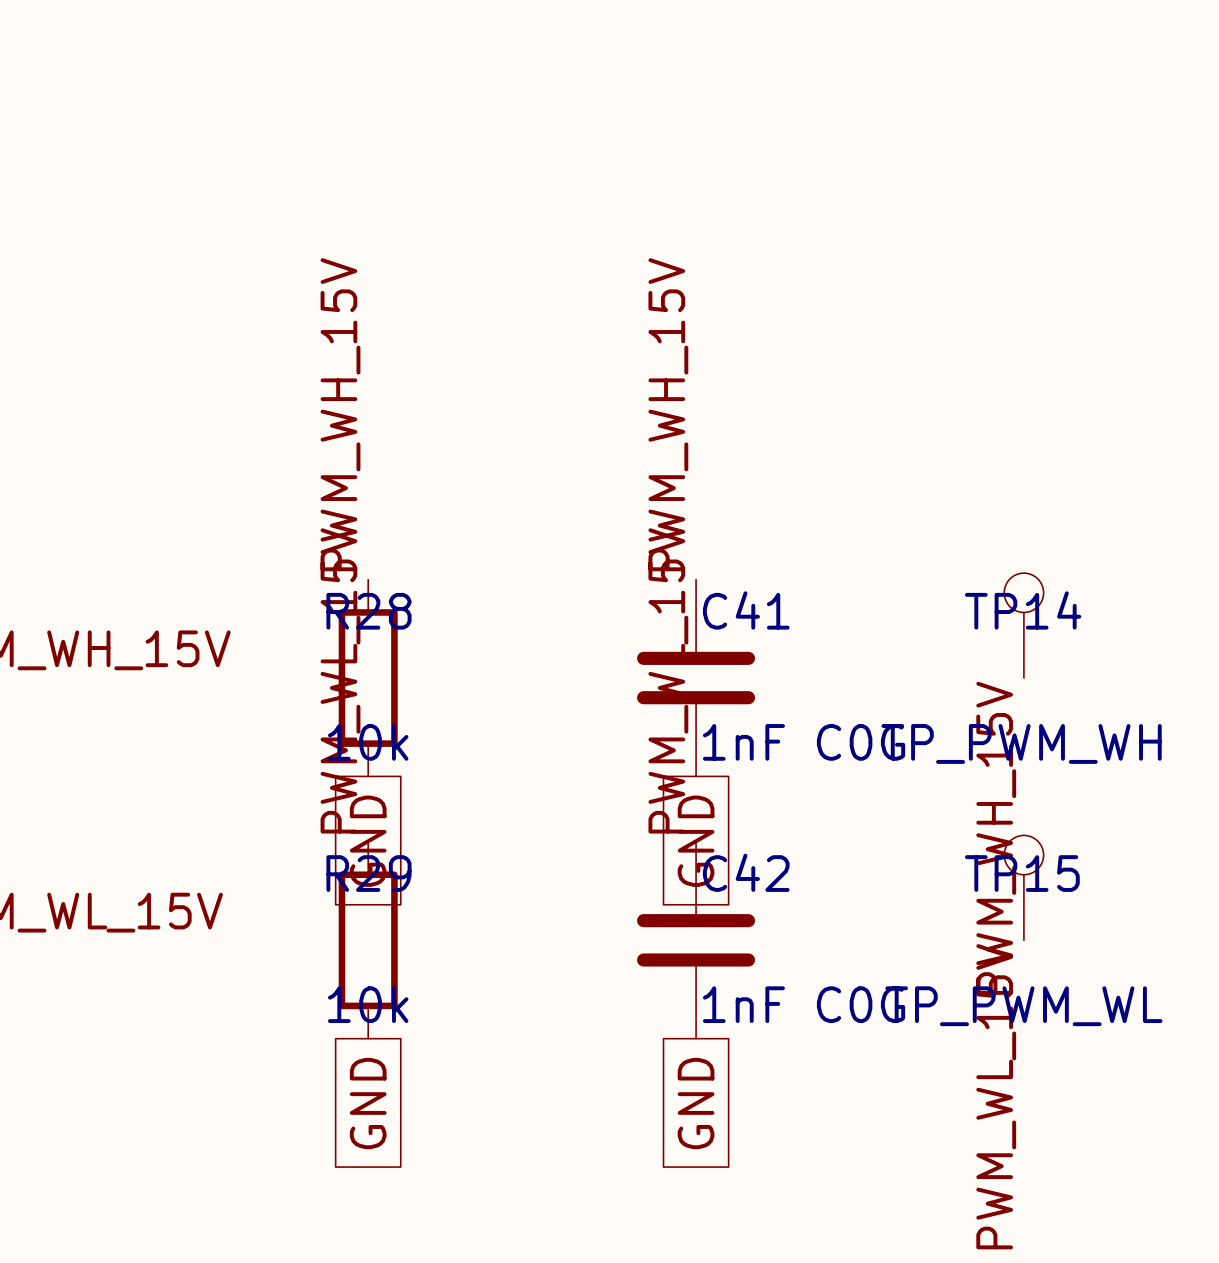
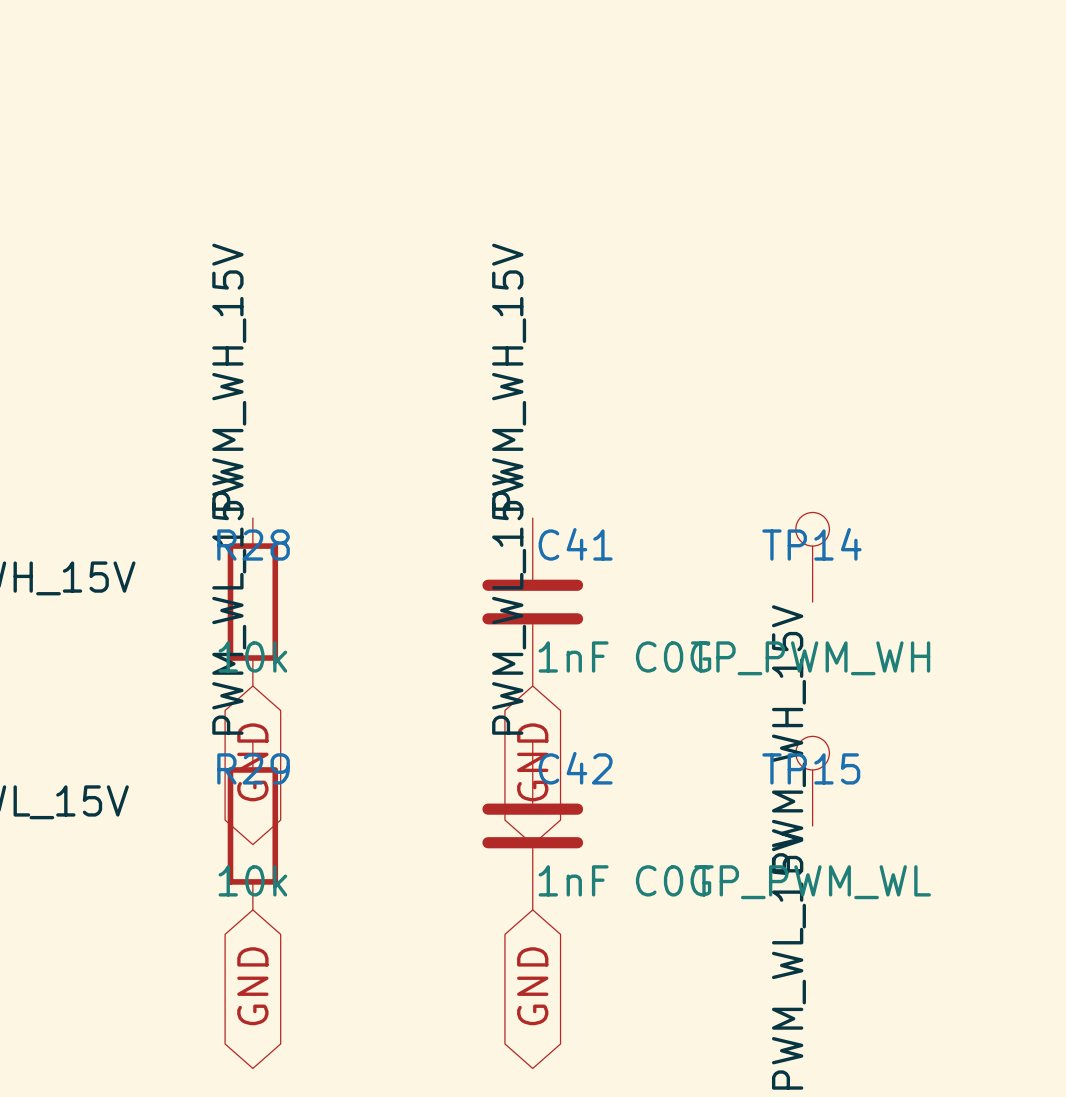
global label shape: passive (368, 841) -> bidirectional (252, 762)
global label shape: passive (696, 841) -> bidirectional (532, 762)
global label shape: passive (368, 1103) -> bidirectional (252, 986)
global label shape: passive (696, 1103) -> bidirectional (532, 986)

